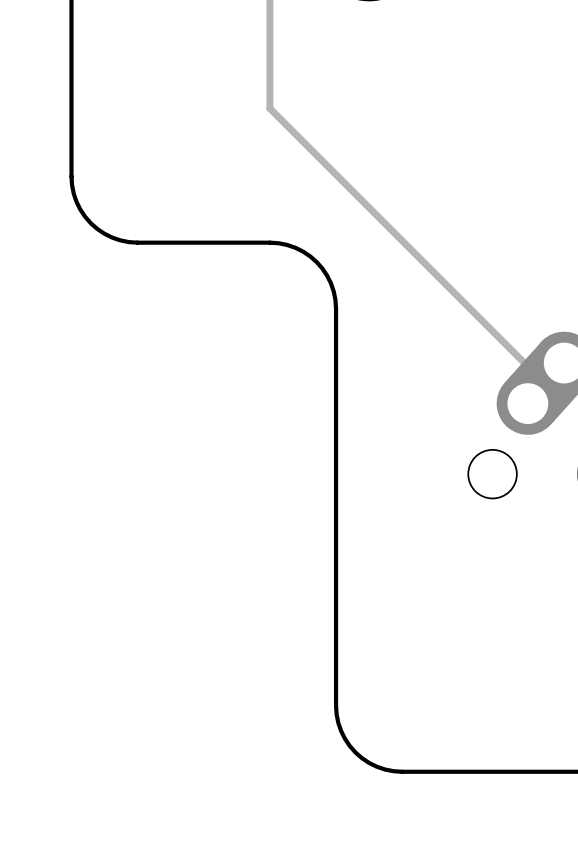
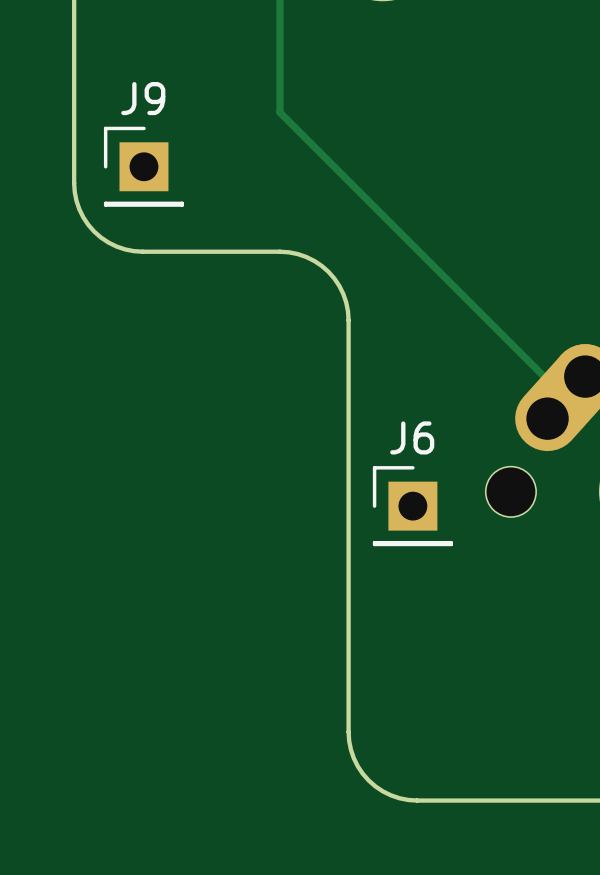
J9: none -> (143, 166)
J6: none -> (412, 506)

